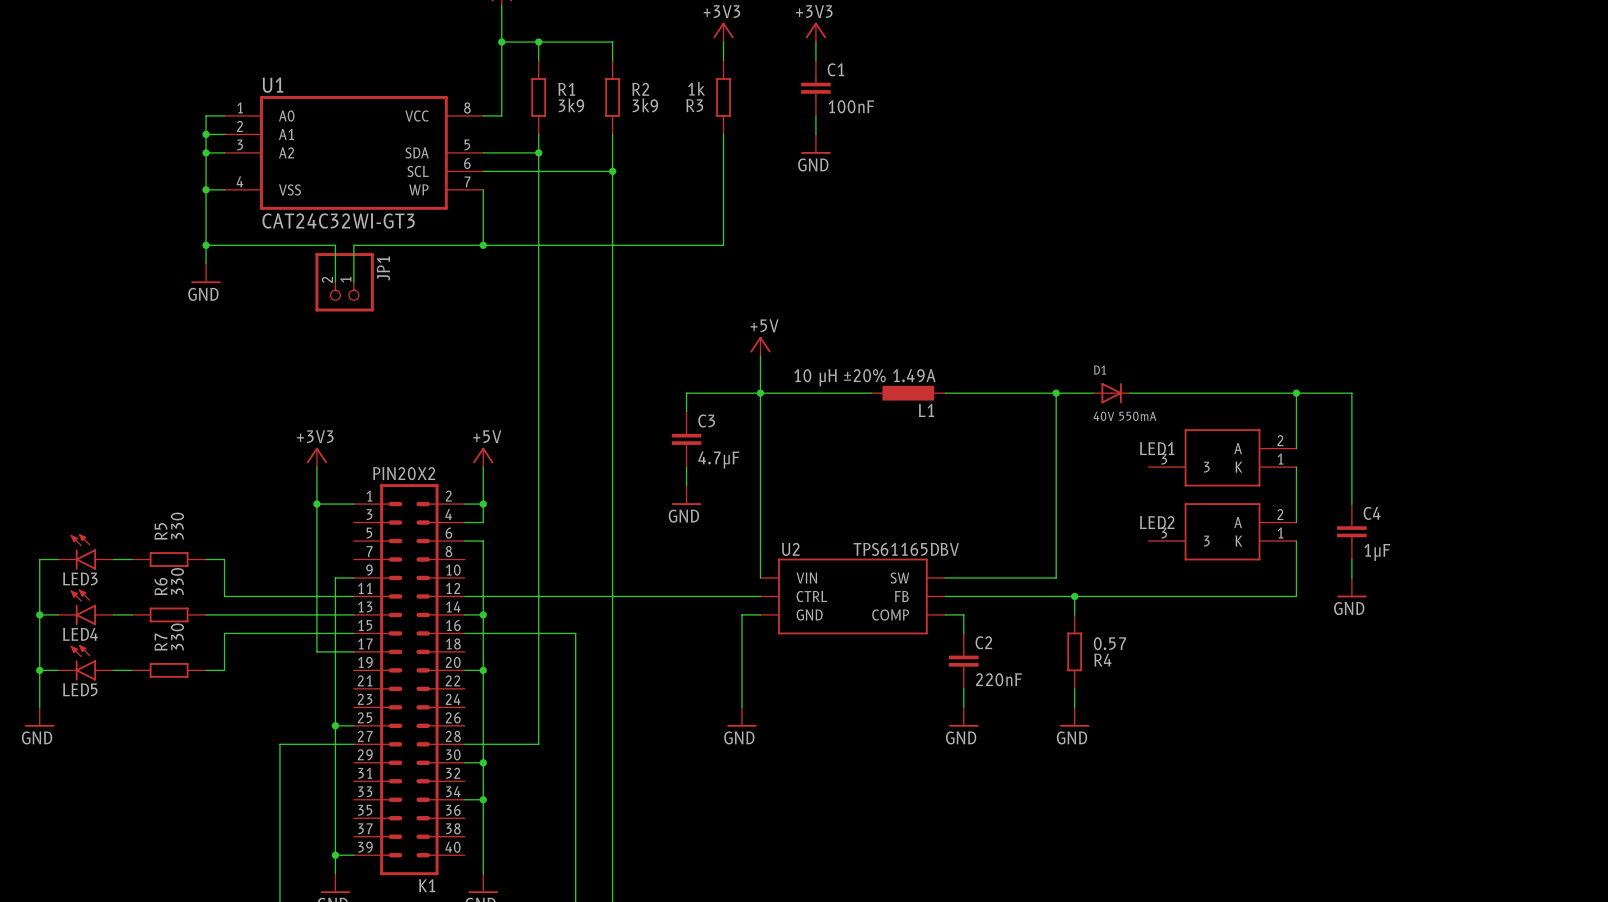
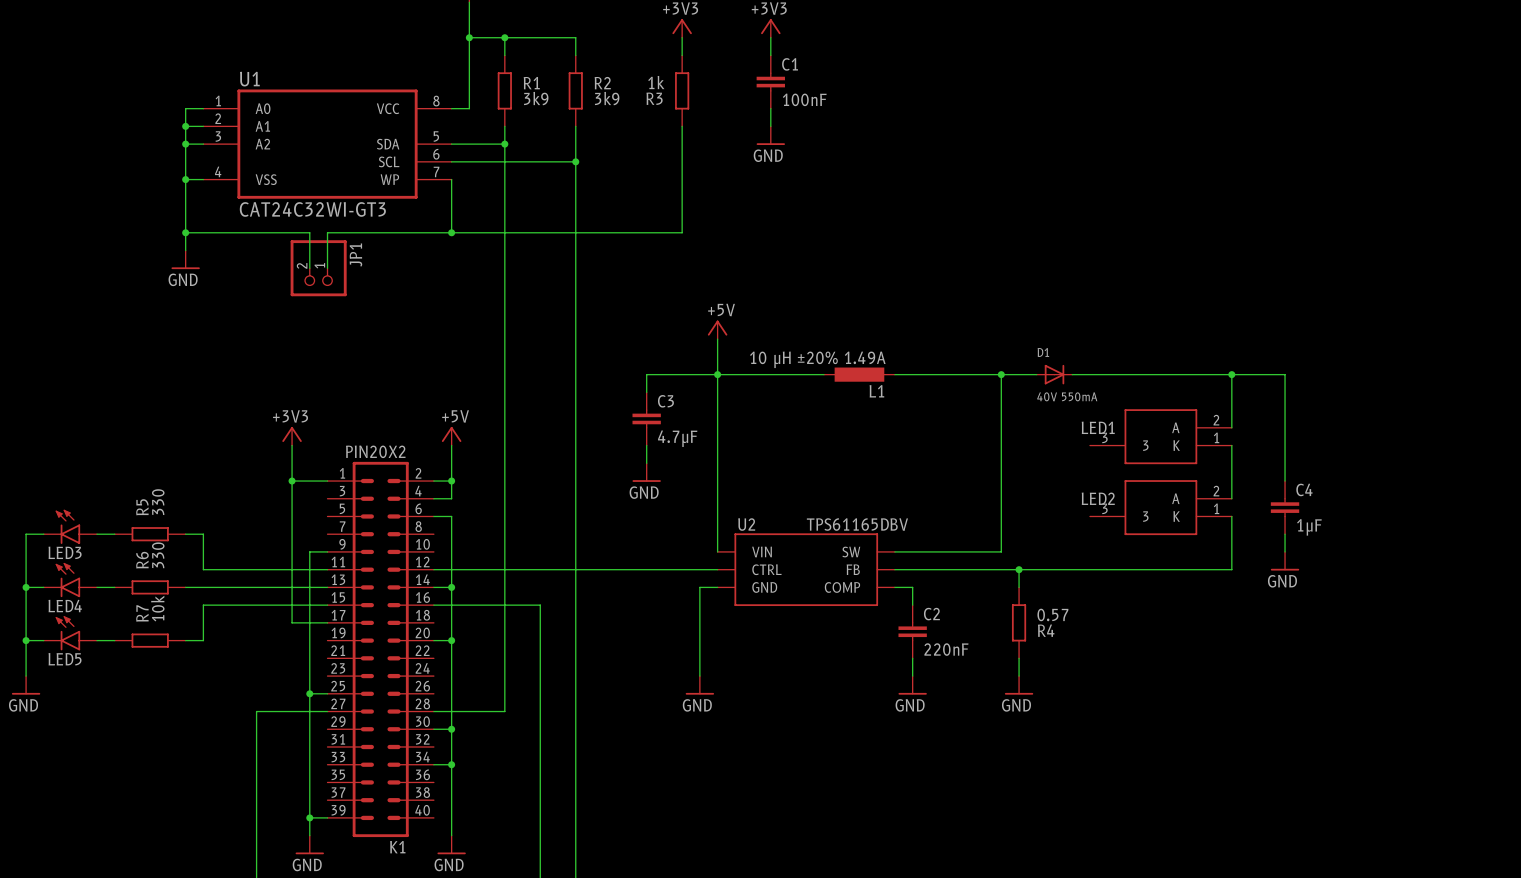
R7 value: 330 (177, 636) -> 10k (157, 608)

